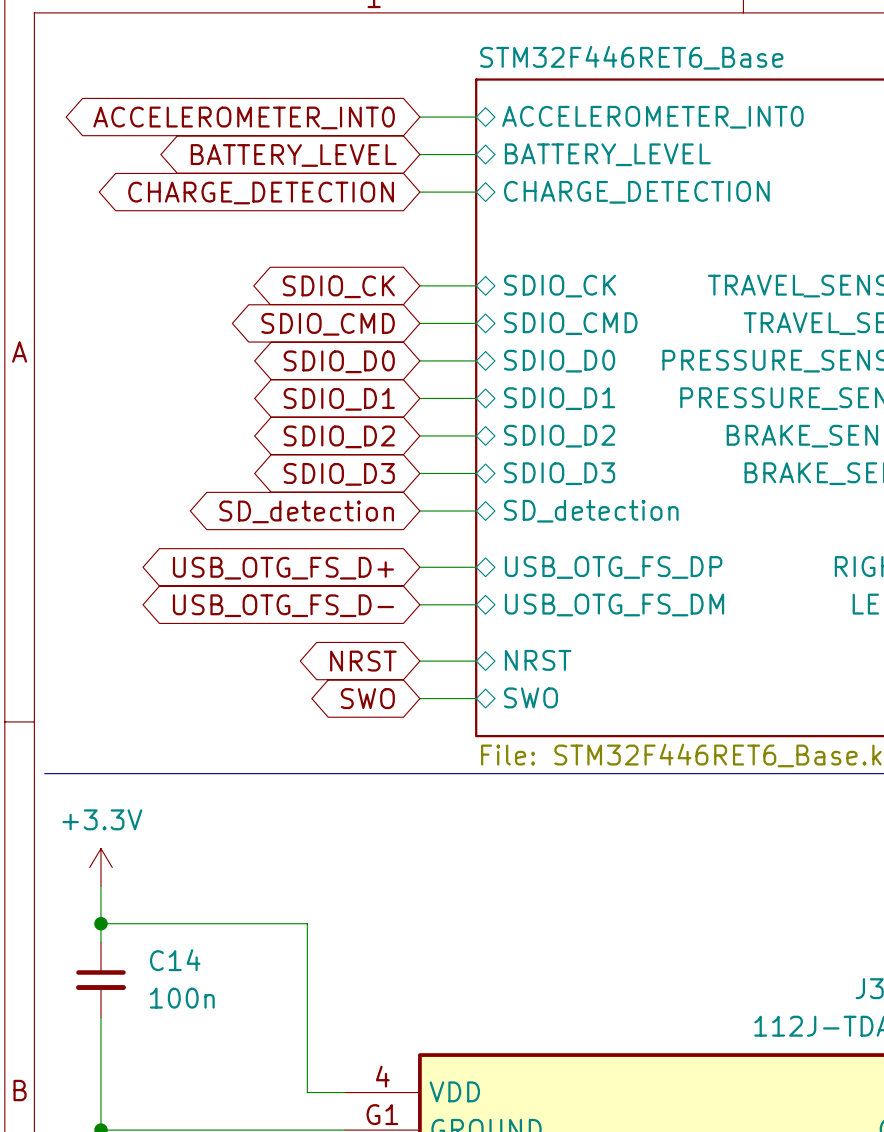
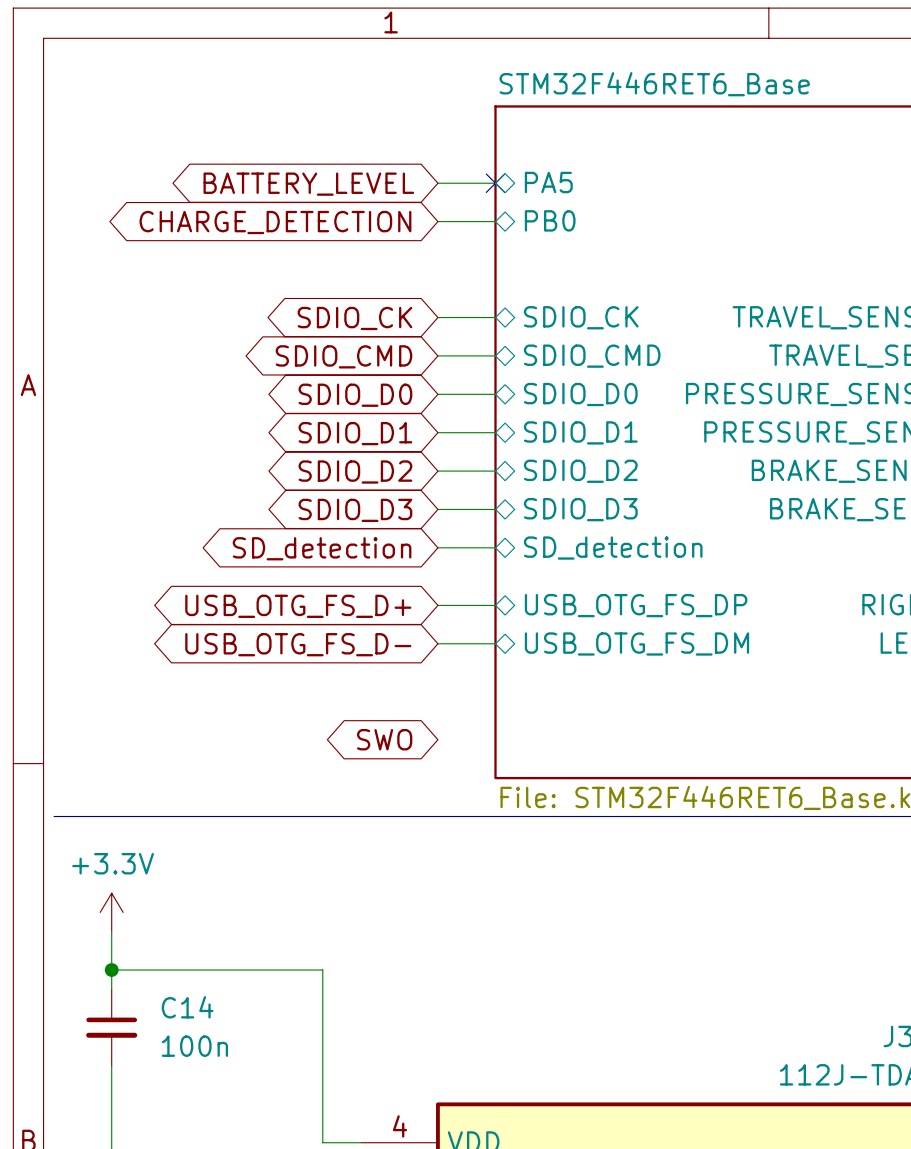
global label: ACCELEROMETER_INT0 (244, 117) -> none
wire: (419, 117) (476, 117) -> none
sheet pin: ACCELEROMETER_INT0 (652, 117) -> none
no-connect mark: none -> (495, 183)
sheet pin: BATTERY_LEVEL (607, 154) -> PA5 (548, 182)
sheet pin: CHARGE_DETECTION (636, 192) -> PB0 (550, 220)
sheet pin: NRST (538, 660) -> none
global label: NRST (363, 661) -> none
wire: (419, 661) (476, 661) -> none
sheet pin: SWO (530, 697) -> none
wire: (419, 698) (476, 698) -> none

